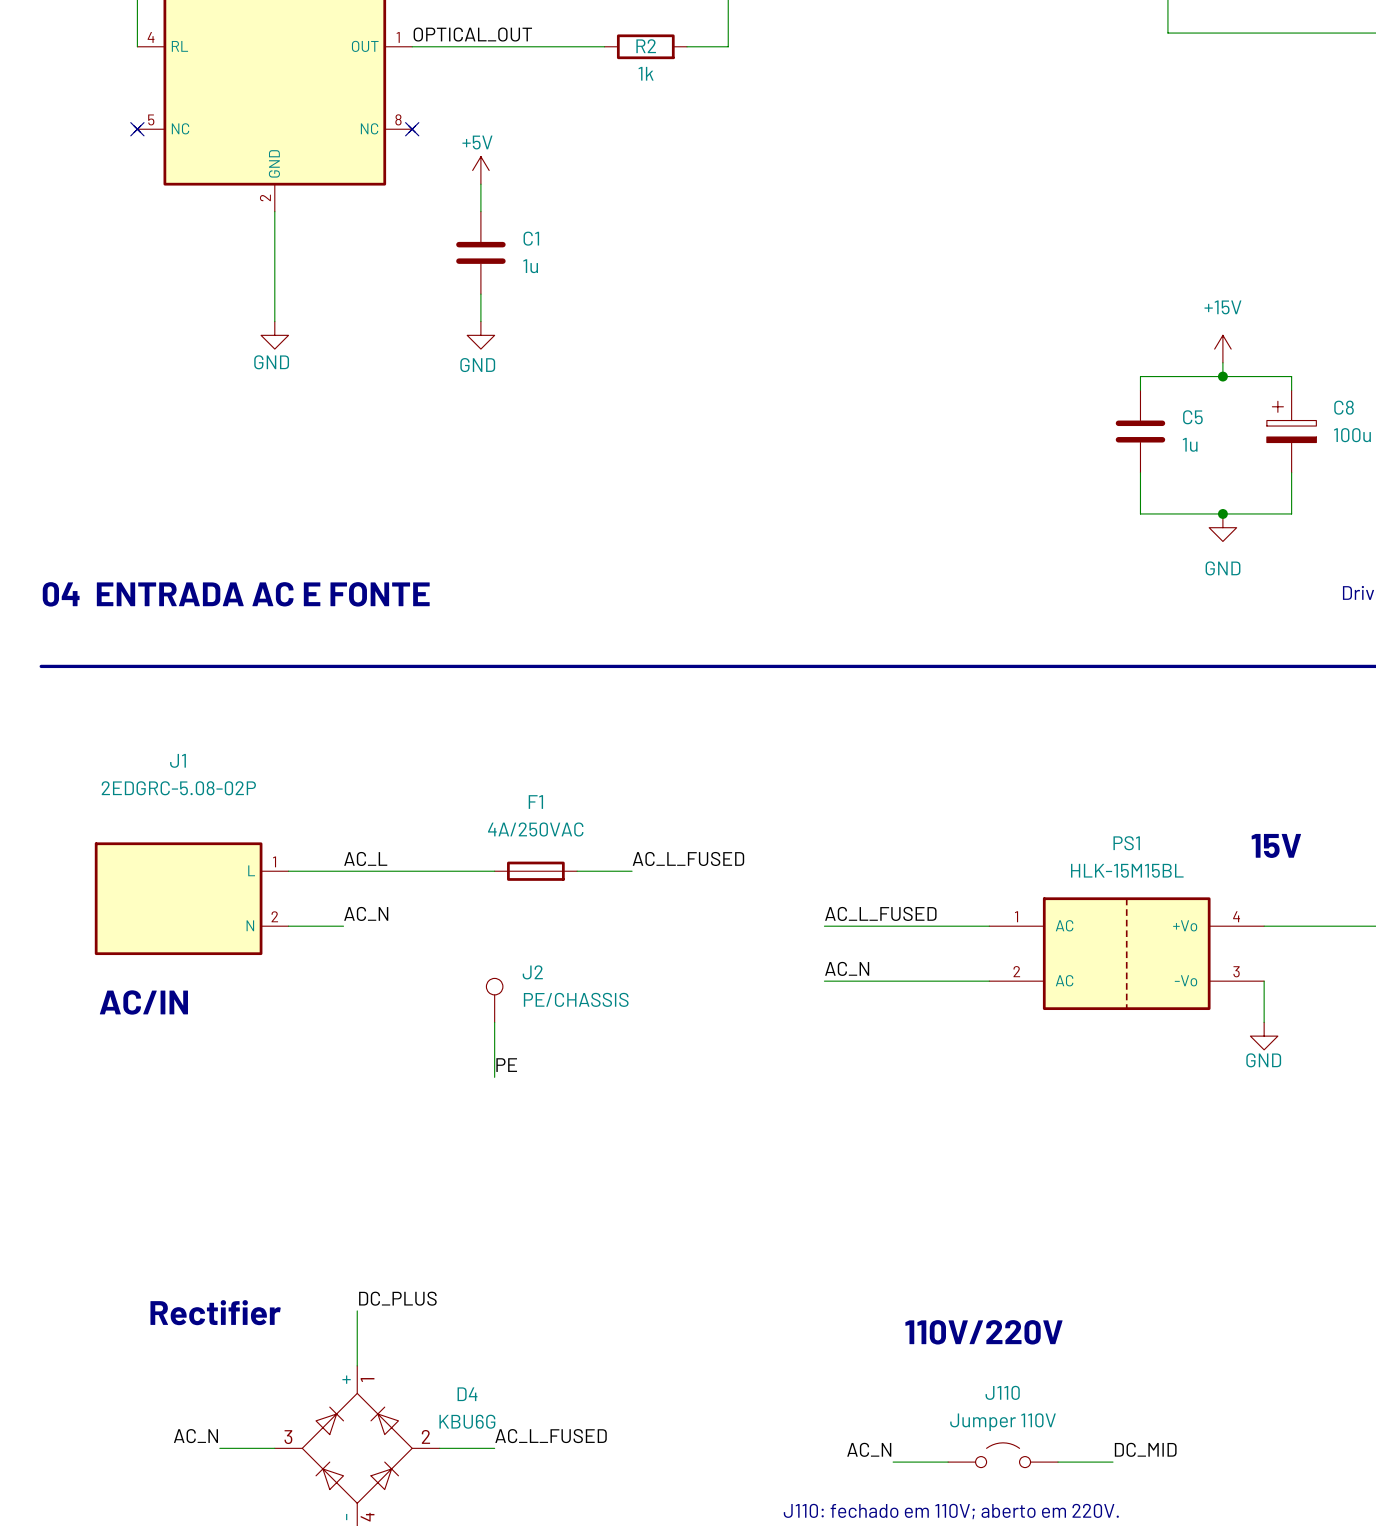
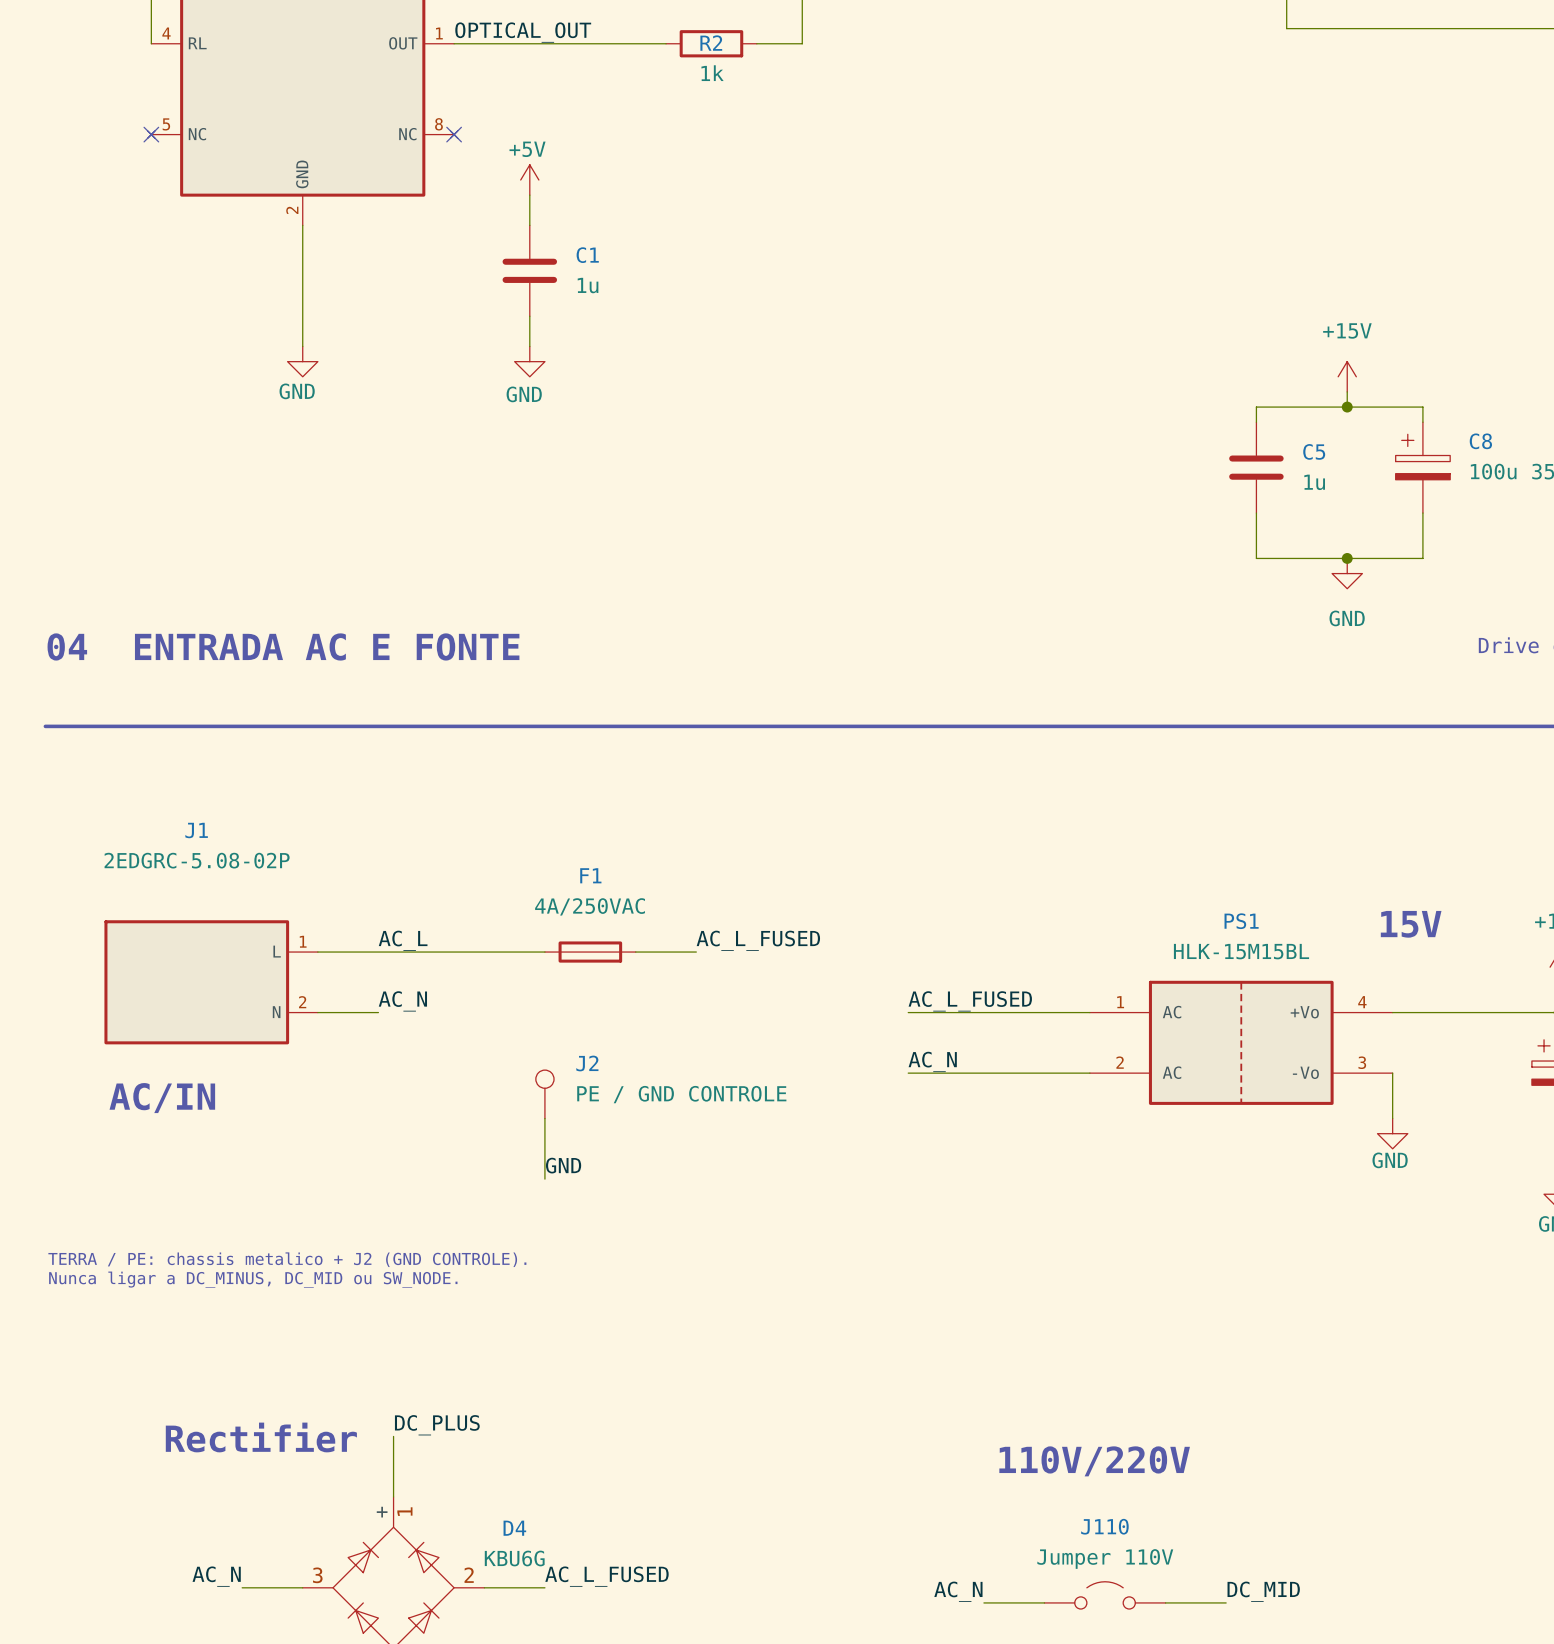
J2 value: PE/CHASSIS (576, 999) -> PE / GND CONTROLE (681, 1094)
label: PE (506, 1065) -> GND (563, 1165)
text: none -> TERRA / PE: chassis metalico + J2 (GND CONTROLE). (287, 1259)
text: none -> Nunca ligar a DC_MINUS, DC_MID ou SW_NODE. (253, 1279)

